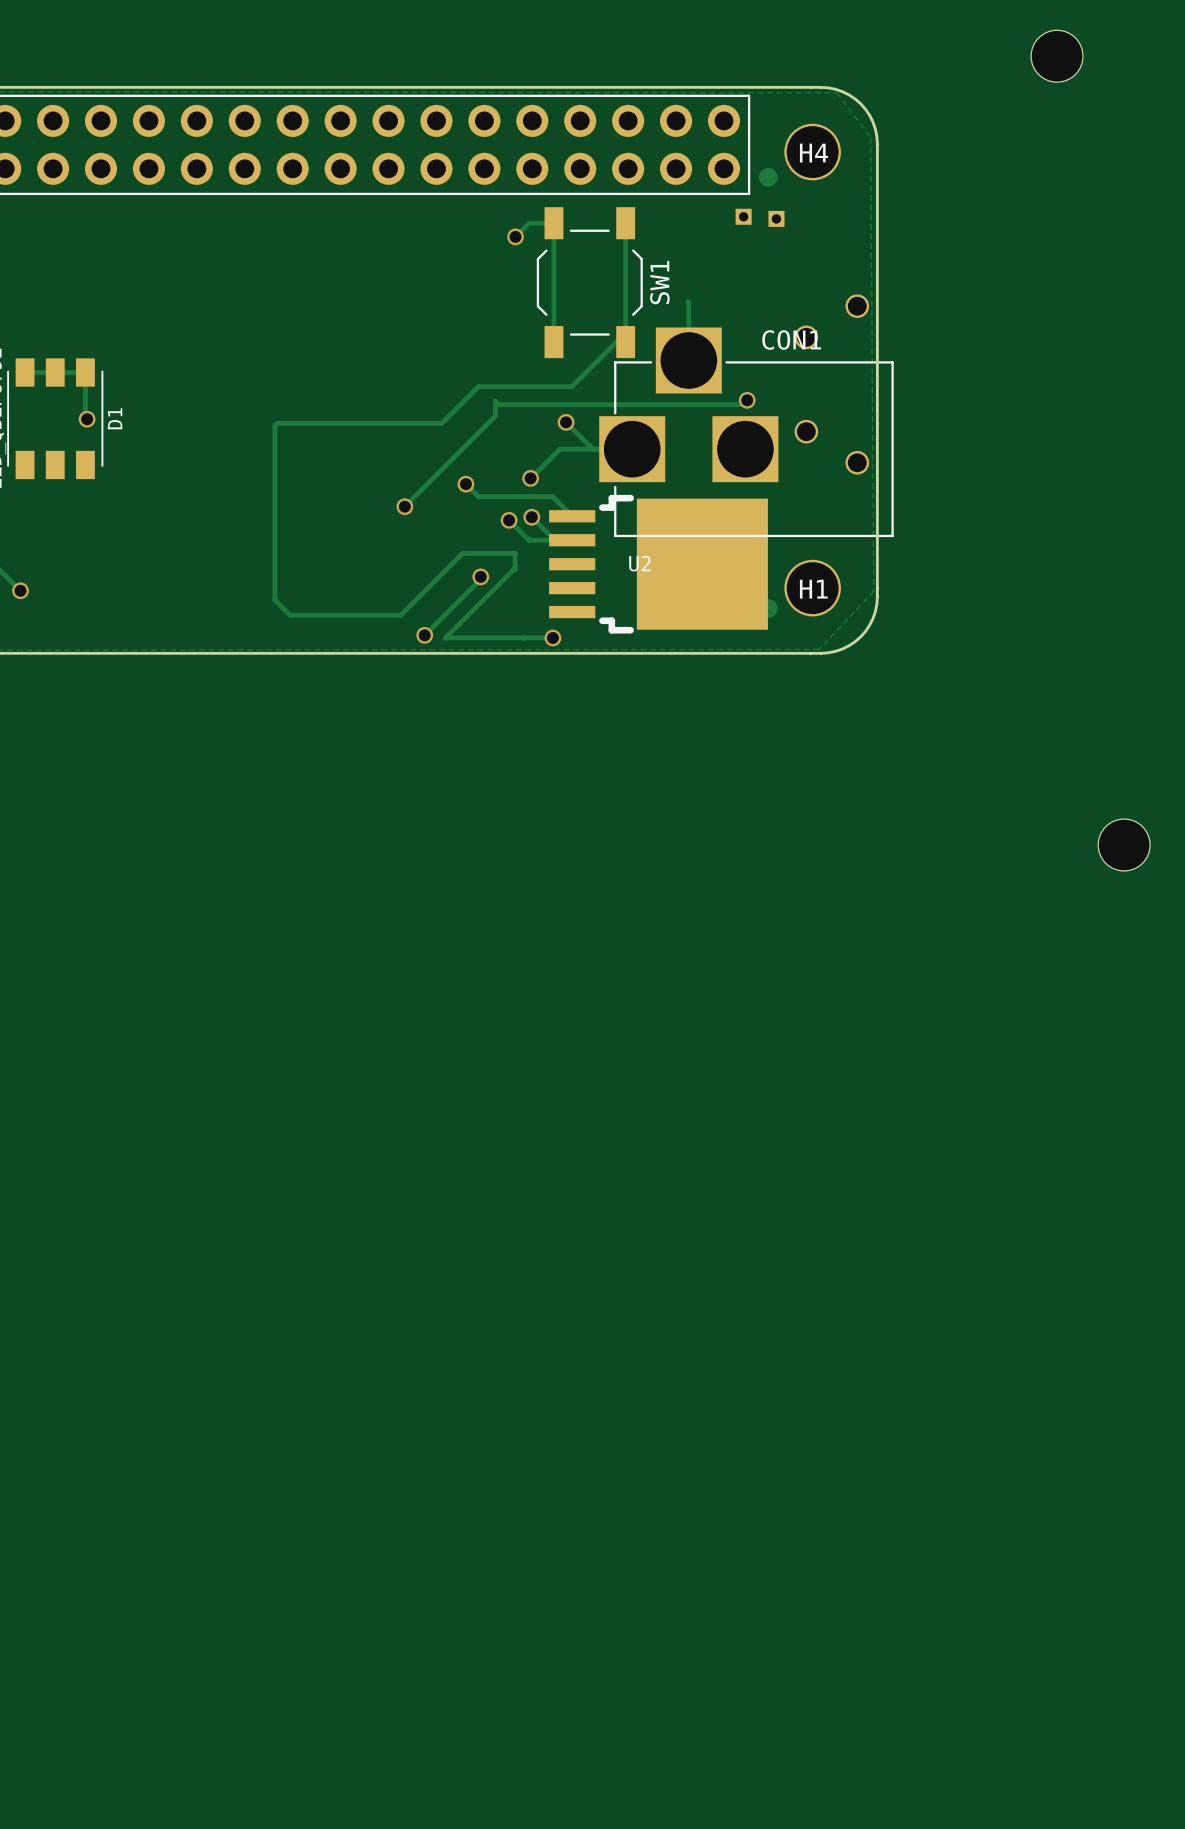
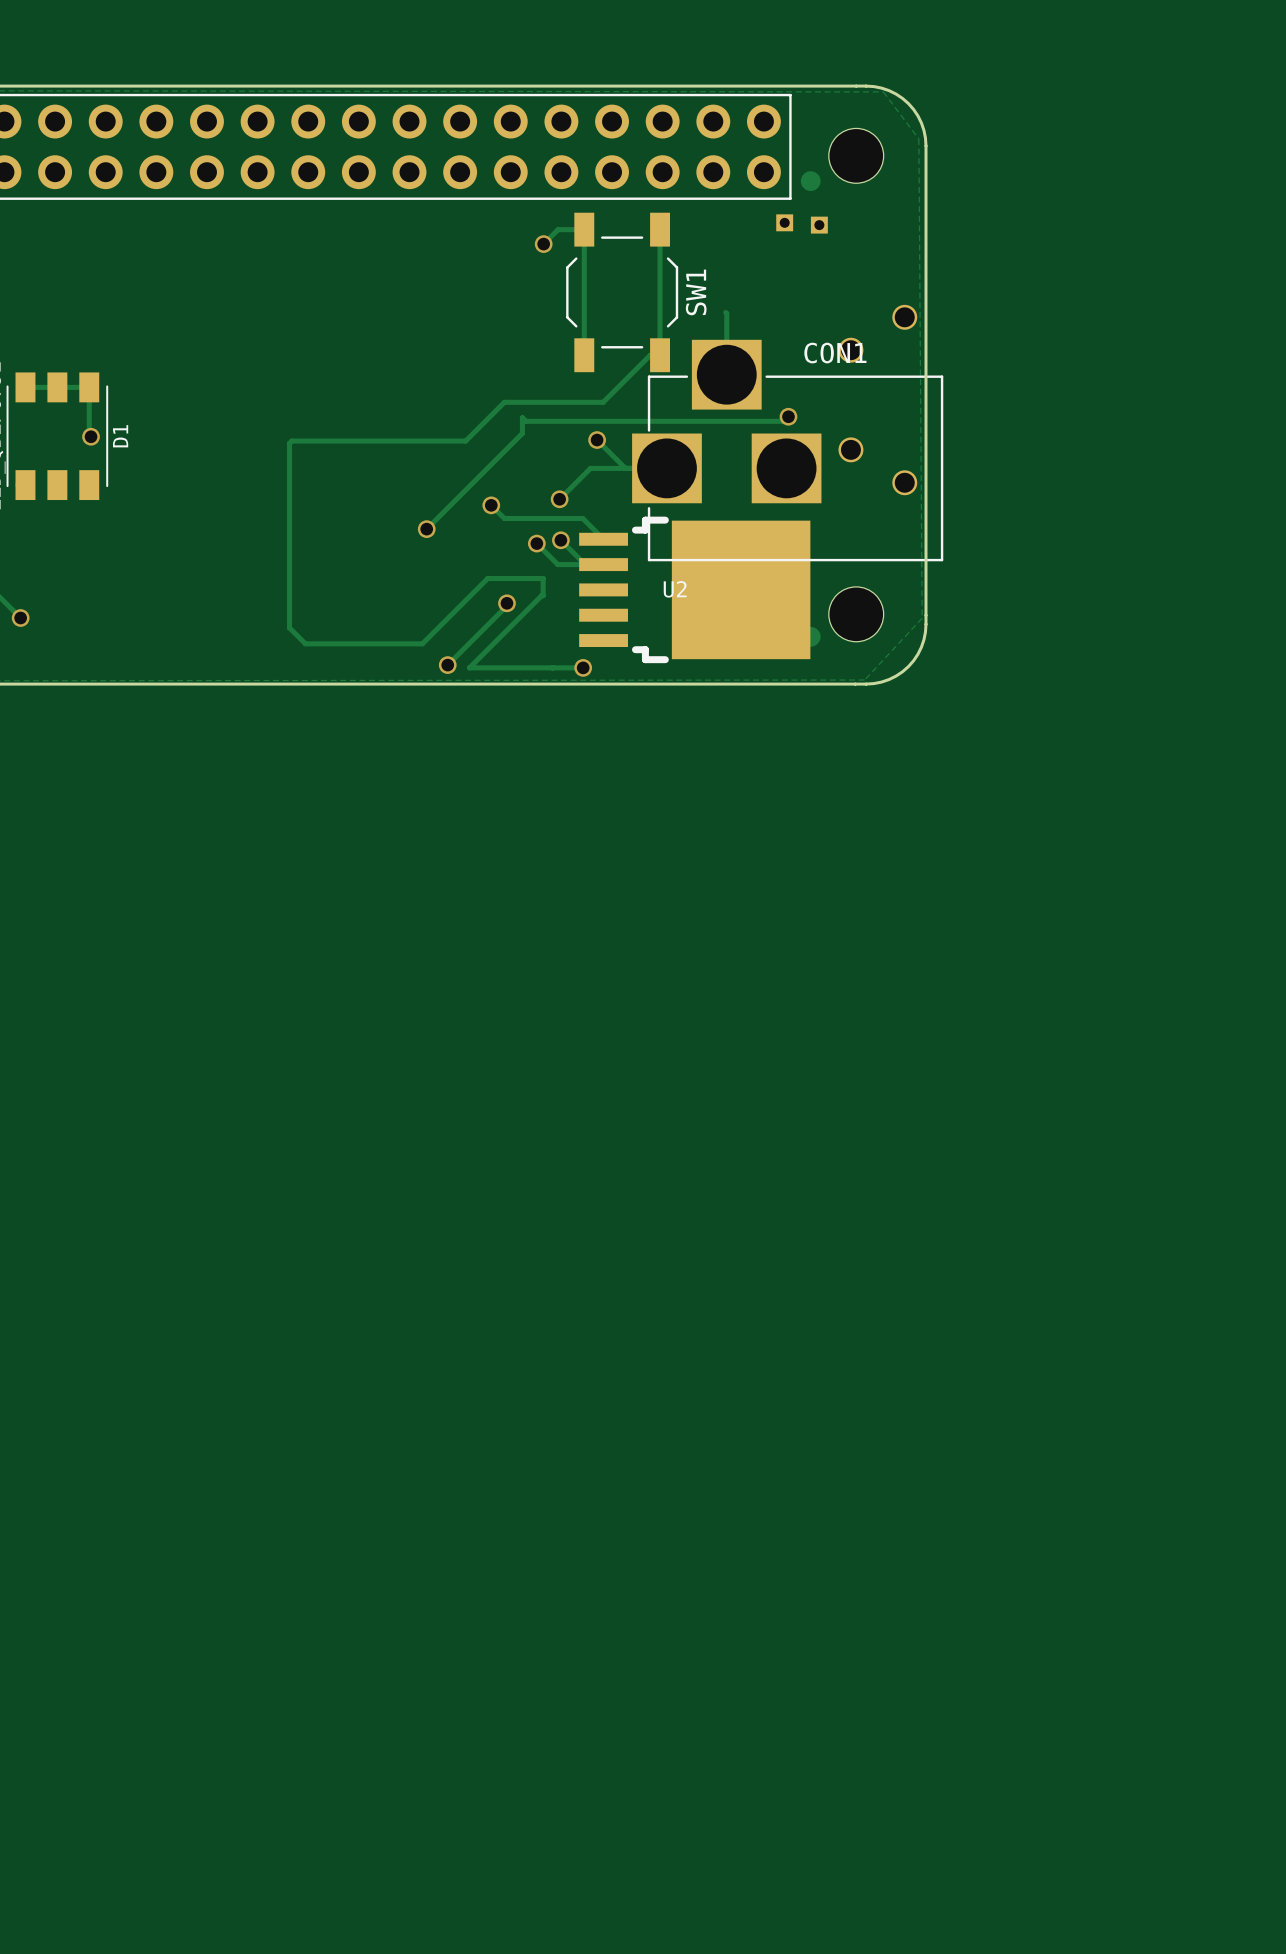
part position: (1057, 56) -> (856, 155)
H4: (812, 152) -> none
part: none -> (856, 614)
H1: (812, 588) -> none
part: (1124, 845) -> none

